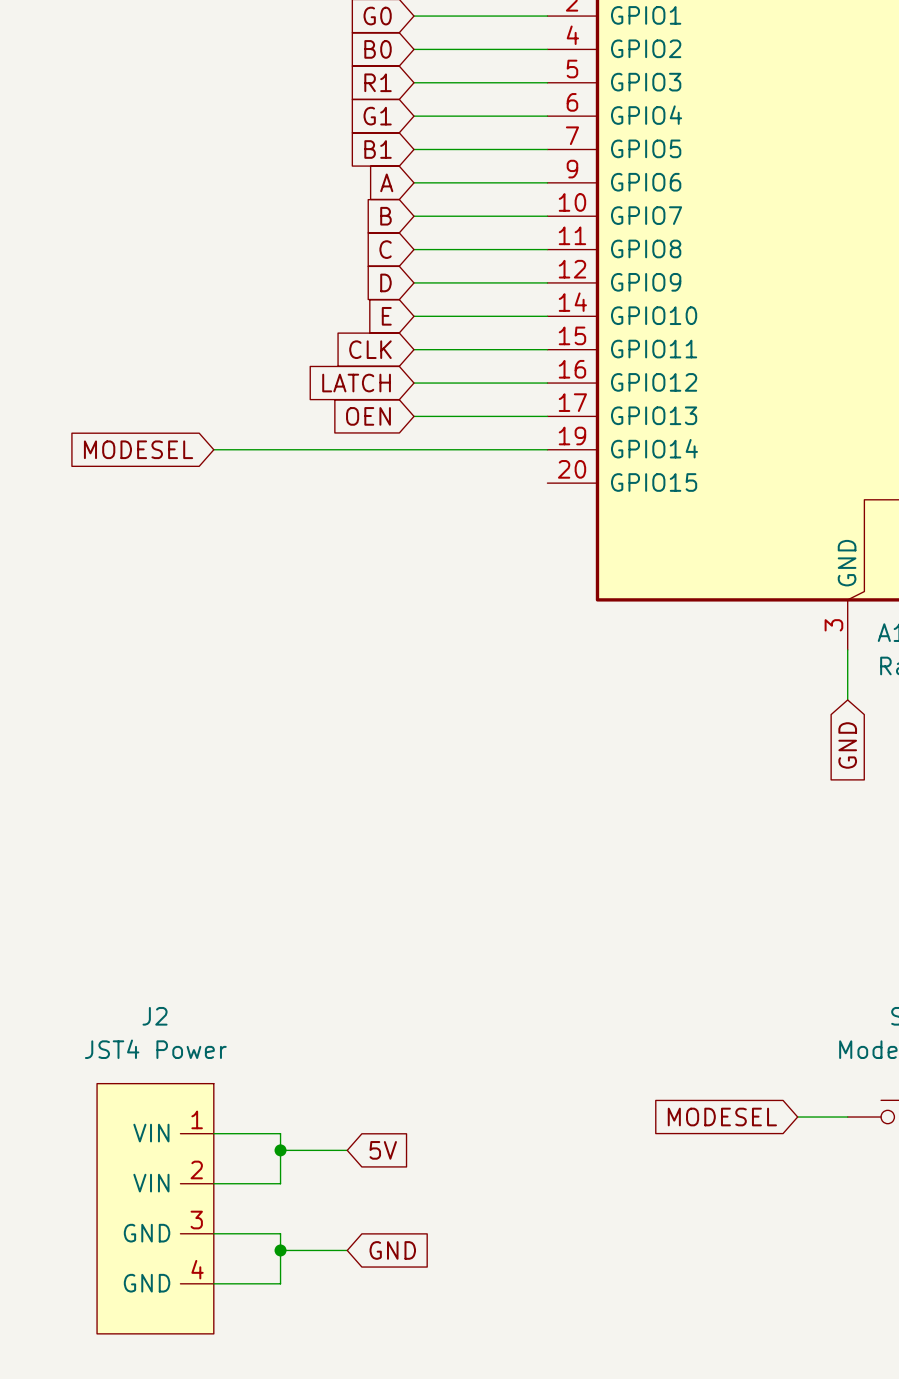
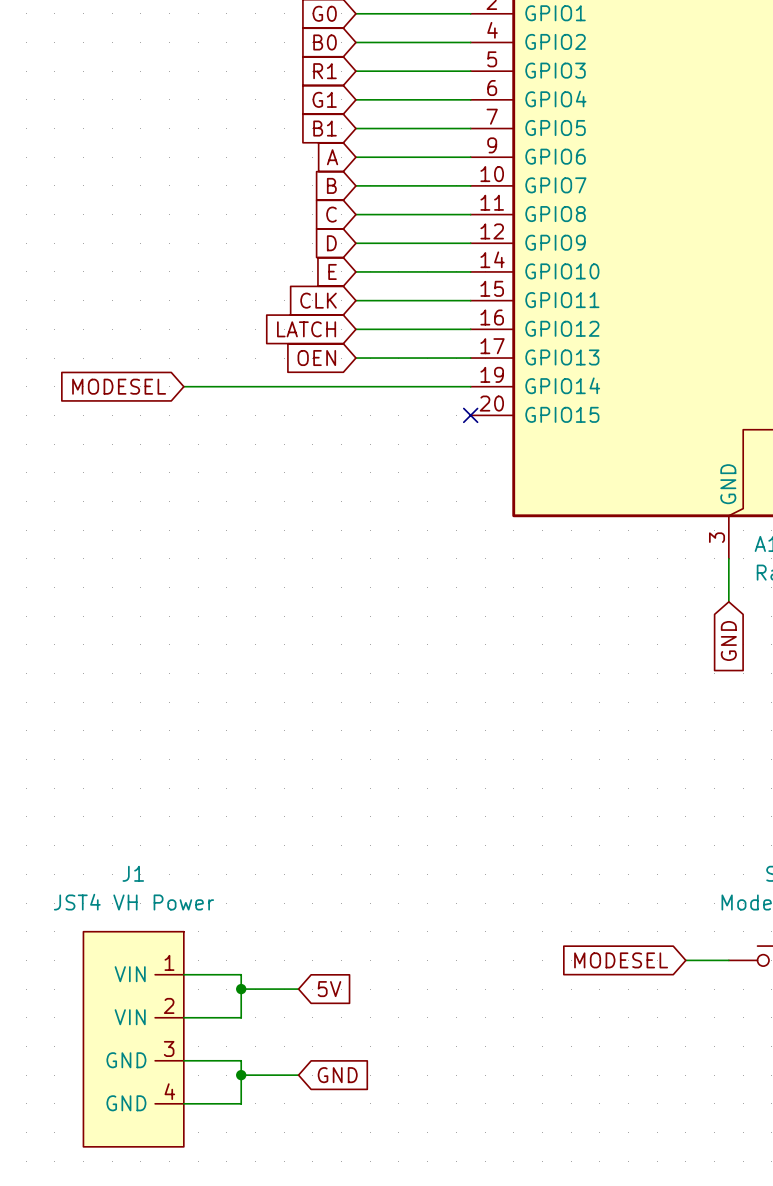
no-connect mark: none -> (470, 415)
J2 name: J2 (155, 1016) -> J1 (133, 873)
J2 value: JST4 Power (155, 1049) -> JST4 VH Power (133, 902)

